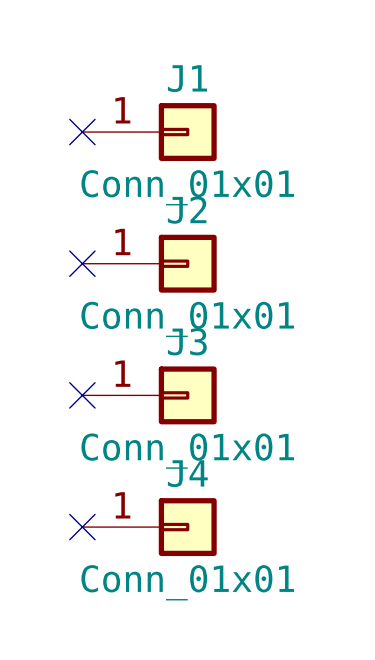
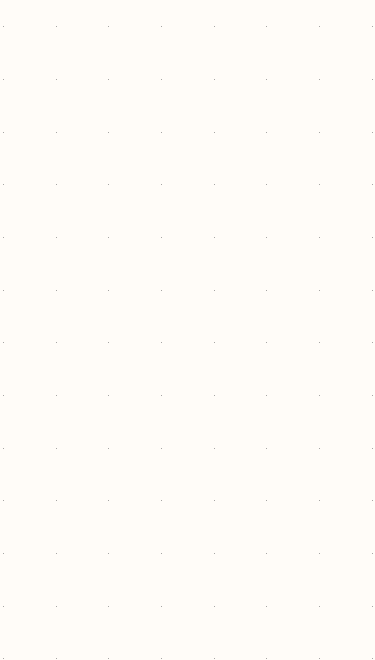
no-connect mark: (82, 132) -> none
J1: Conn_01x01 (149, 132) -> none
no-connect mark: (82, 263) -> none
J2: Conn_01x01 (149, 263) -> none
no-connect mark: (82, 395) -> none
J3: Conn_01x01 (149, 395) -> none
no-connect mark: (82, 527) -> none
J4: Conn_01x01 (149, 527) -> none

